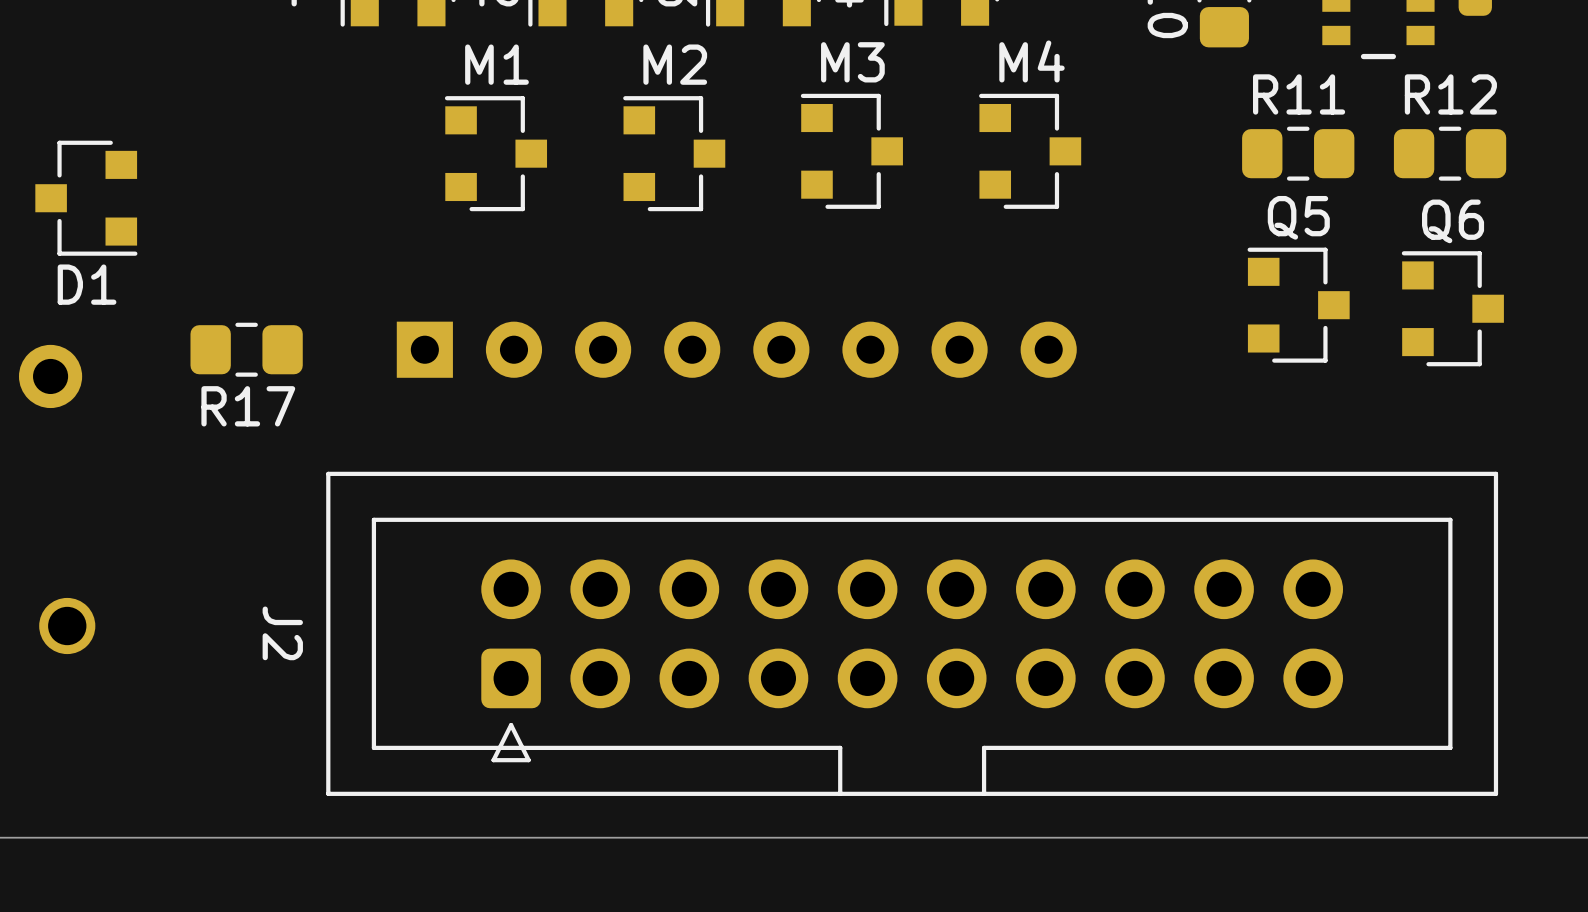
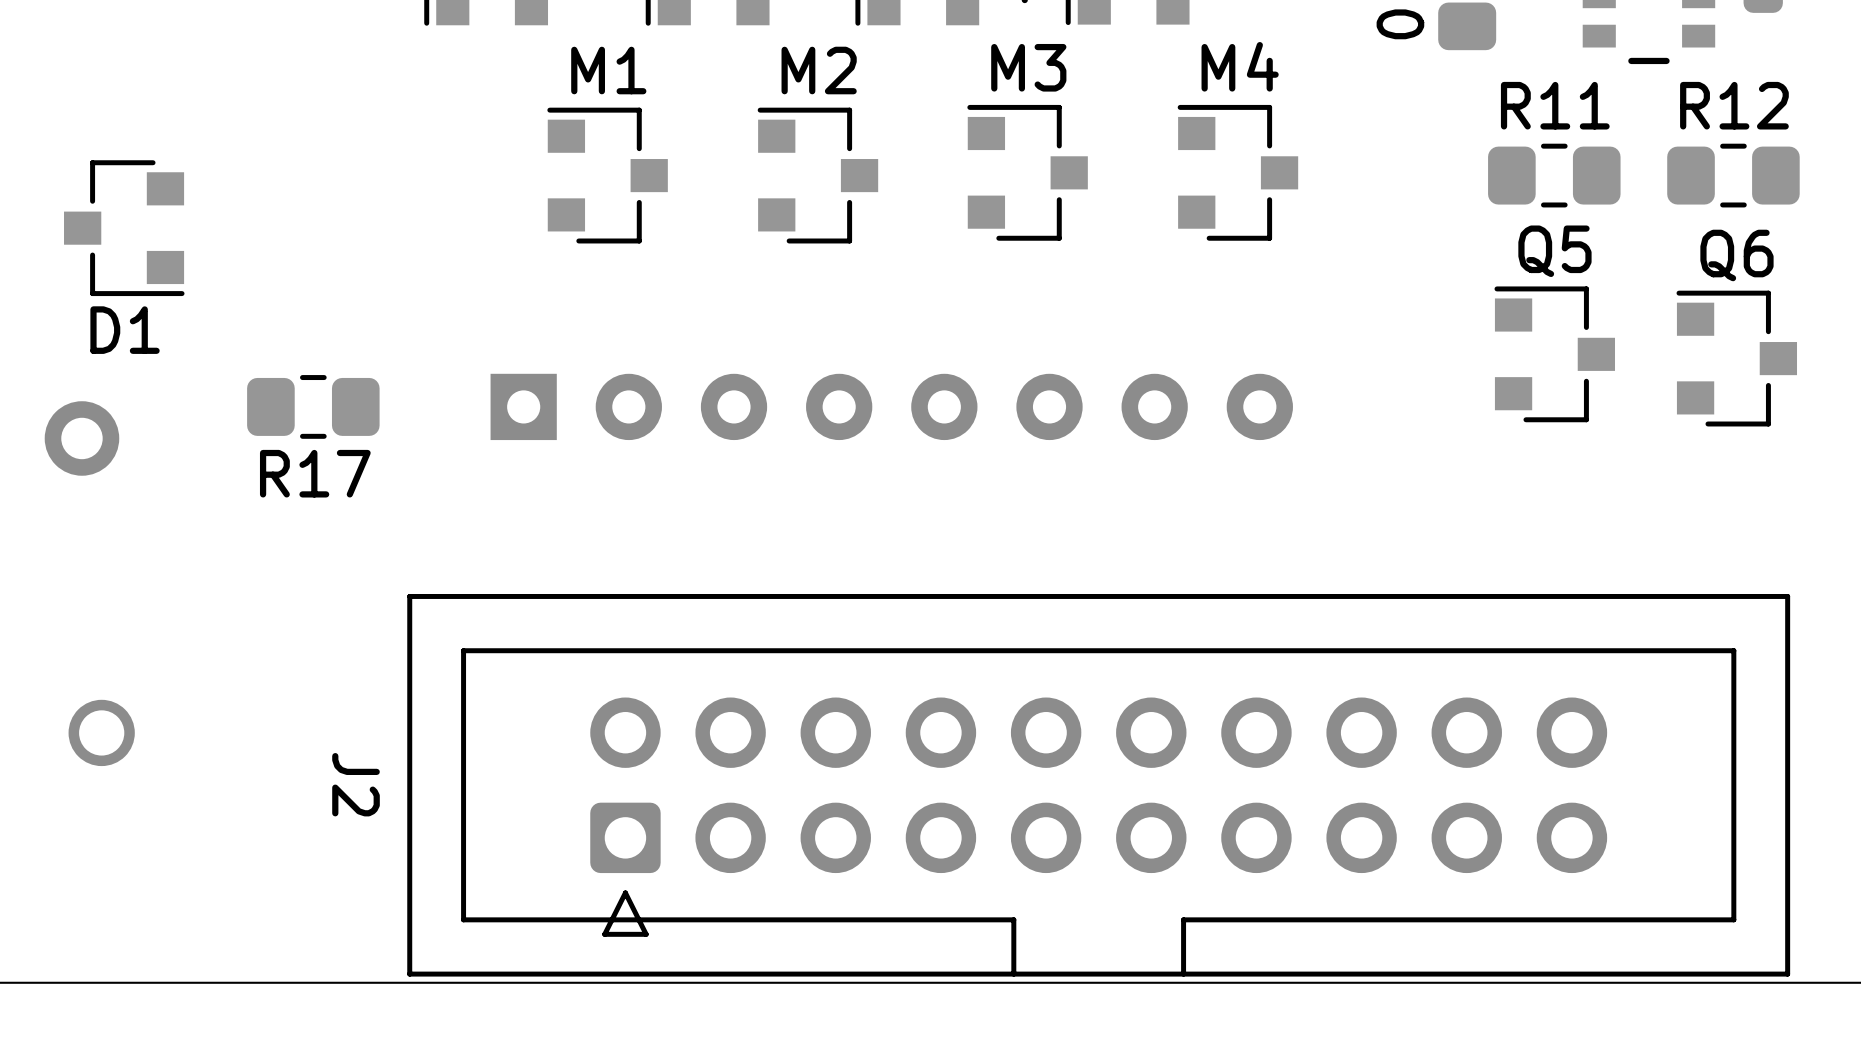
J2 position: (912, 633) -> (1098, 785)

